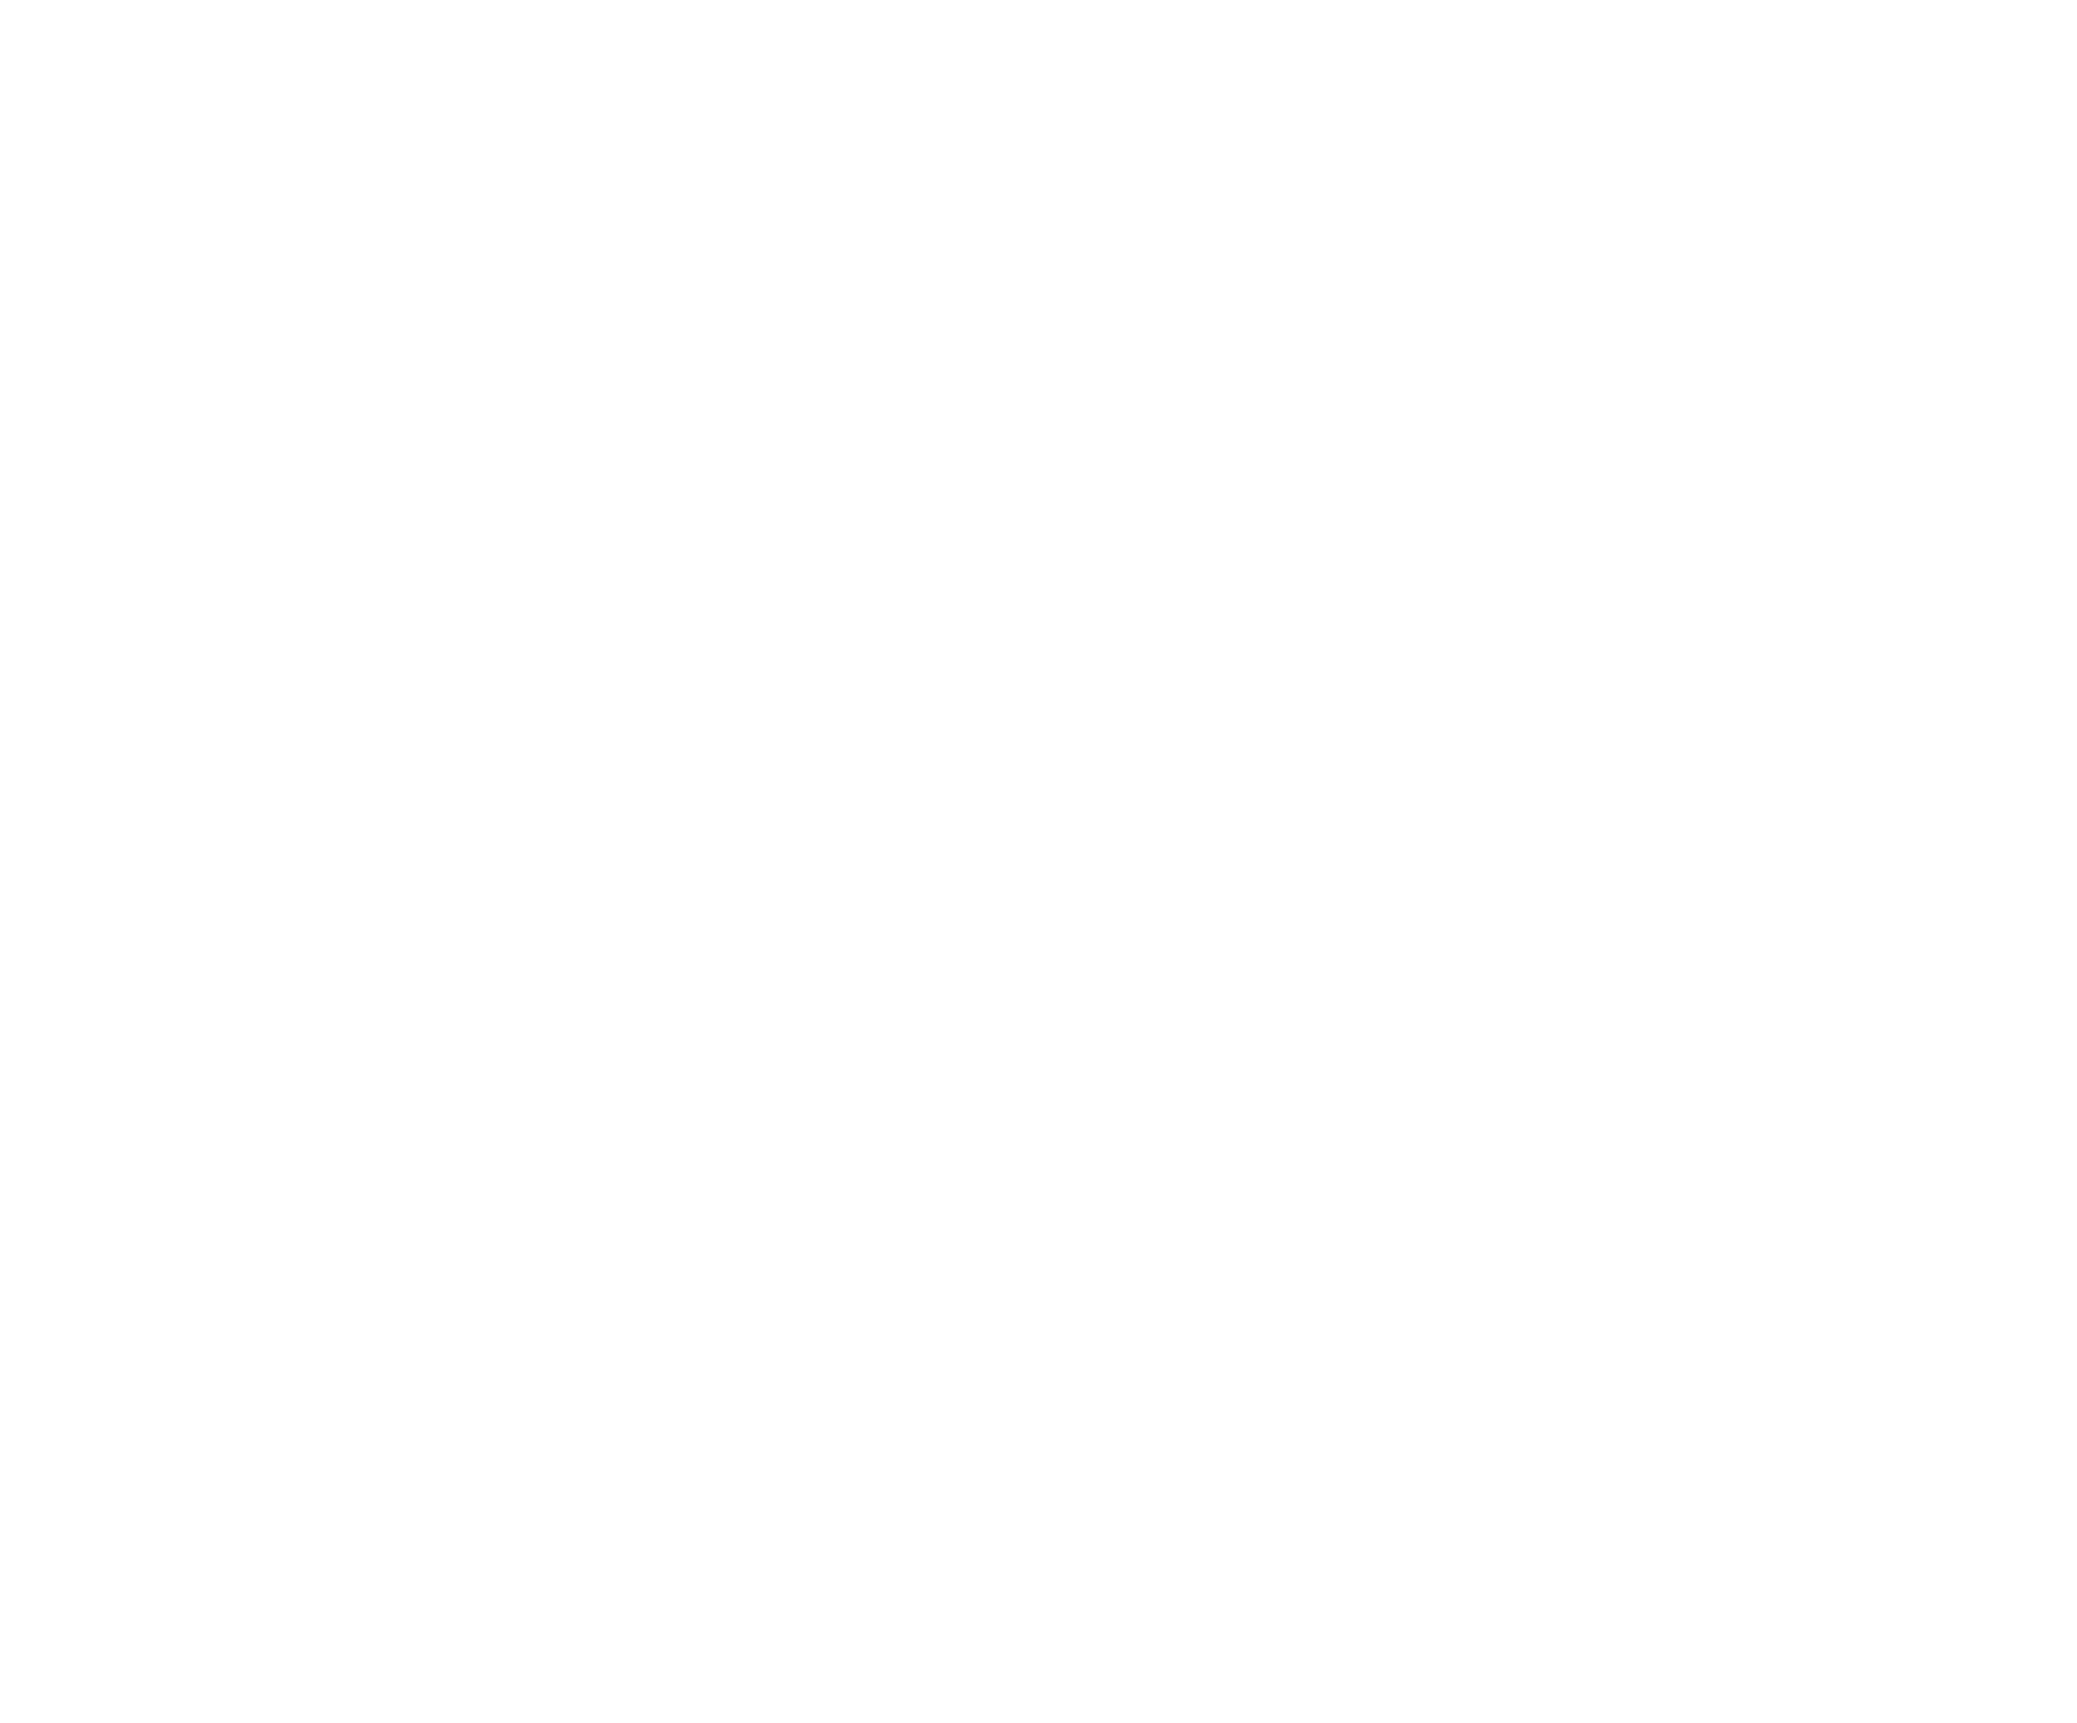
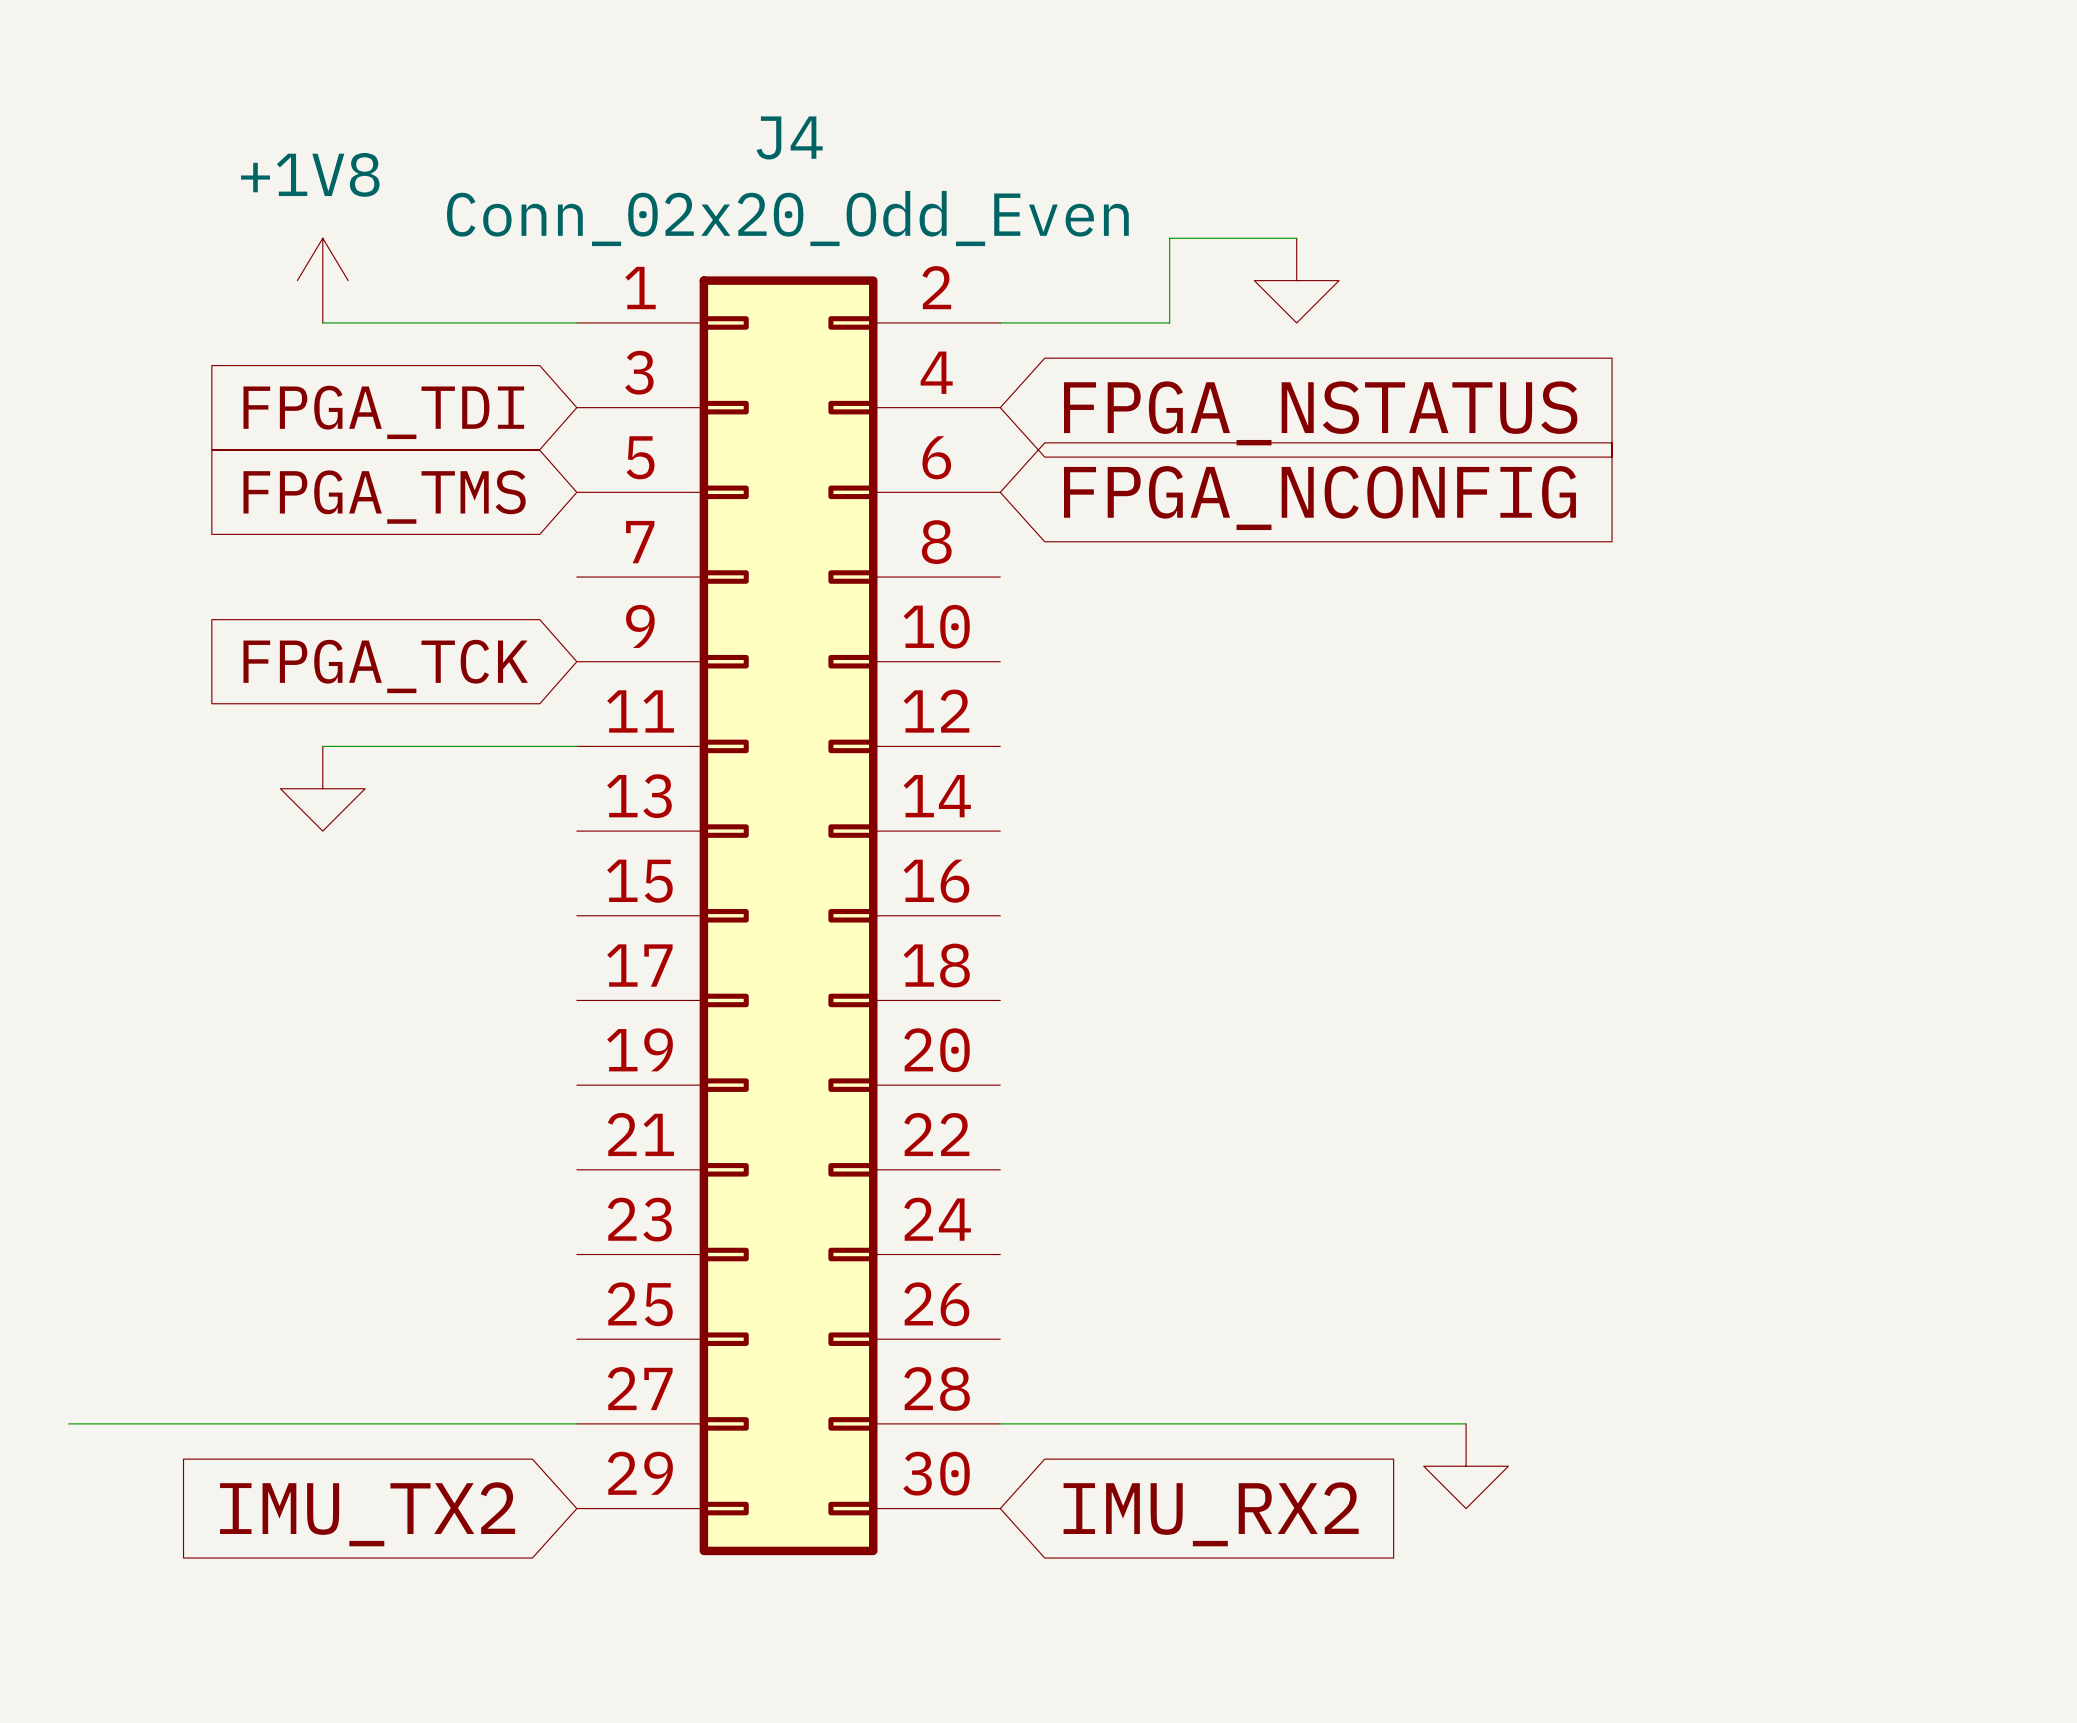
wire: none -> (1296, 238) (1169, 238) (1169, 322) (1000, 322)
power symbol: none -> +1V8 (322, 280)
power symbol: none -> (1296, 280)
wire: none -> (322, 322) (576, 322)
global label: none -> FPGA_TDI (383, 412)
global label: none -> FPGA_NSTATUS (1320, 413)
global label: none -> FPGA_TMS (384, 497)
global label: none -> FPGA_NCONFIG (1319, 498)
global label: none -> FPGA_TCK (385, 666)
wire: none -> (322, 746) (576, 746)
power symbol: none -> (322, 788)
J4: none -> Conn_02x20_Odd_Even (788, 915)
wire: none -> (68, 1423) (576, 1423)
wire: none -> (1000, 1423) (1466, 1423)
power symbol: none -> (1466, 1466)
global label: none -> IMU_TX2 (367, 1514)
global label: none -> IMU_RX2 (1211, 1514)

